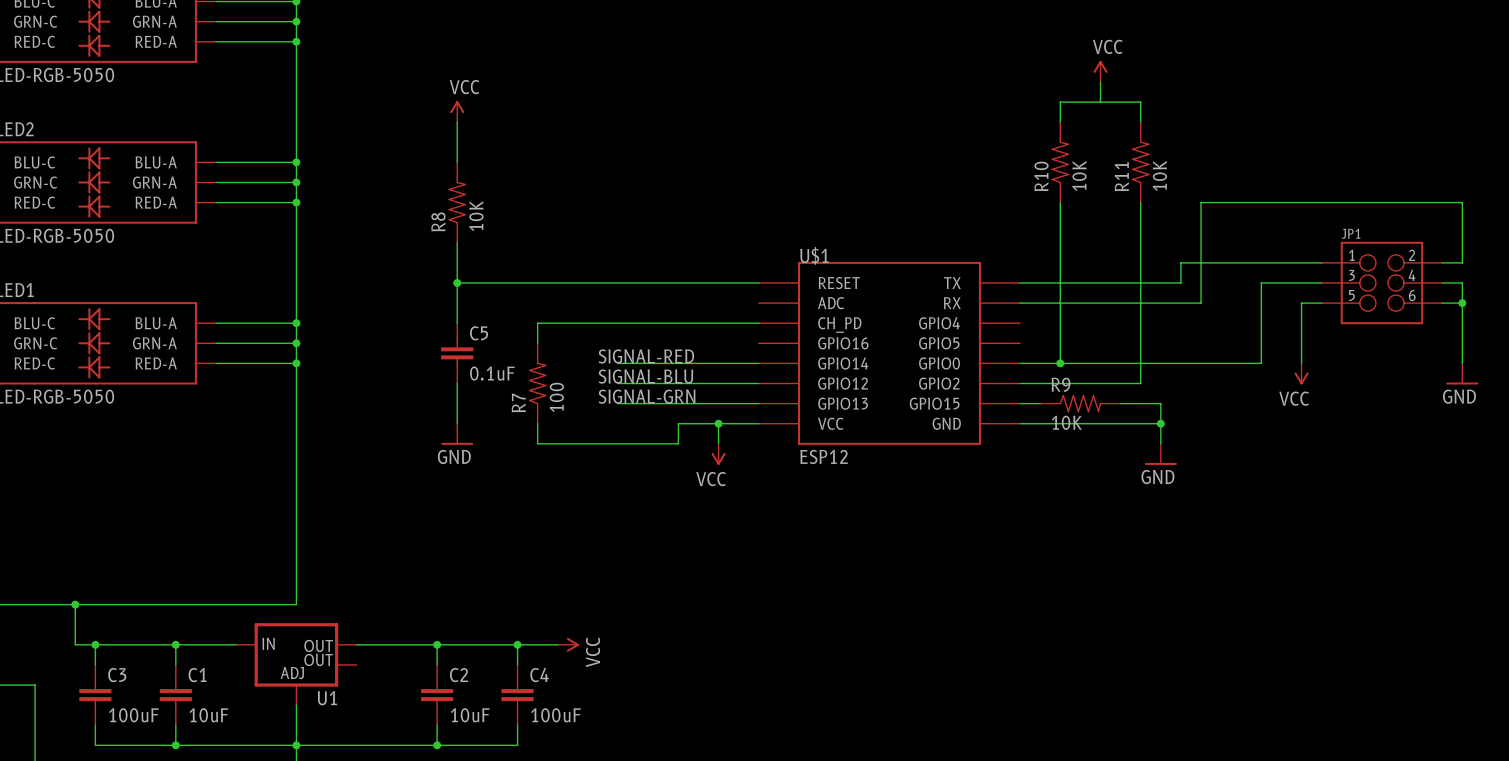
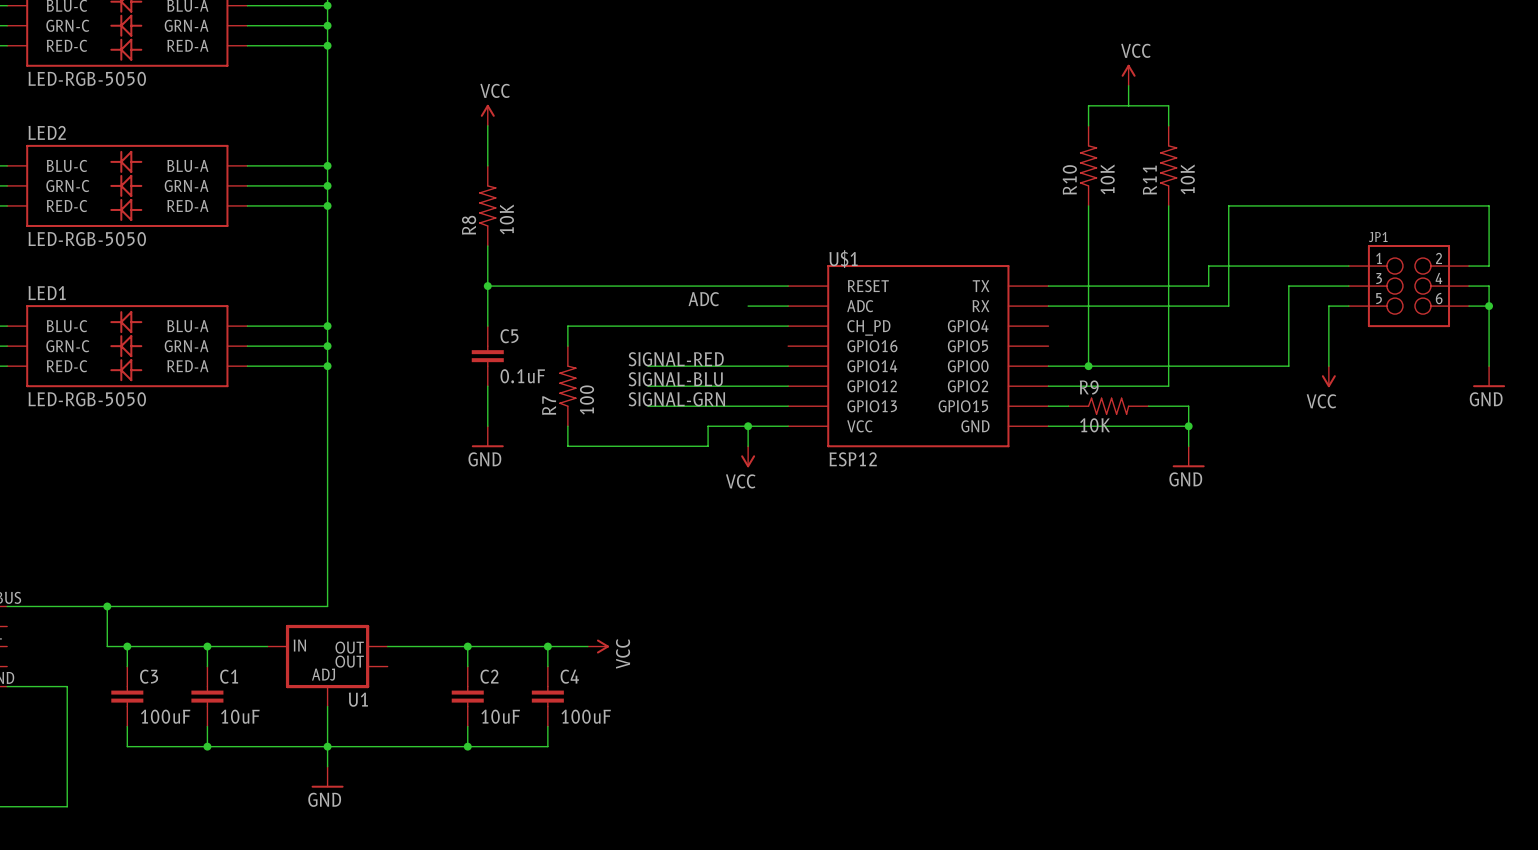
label: none -> ADC (703, 299)
wire: none -> (748, 306) (788, 306)

